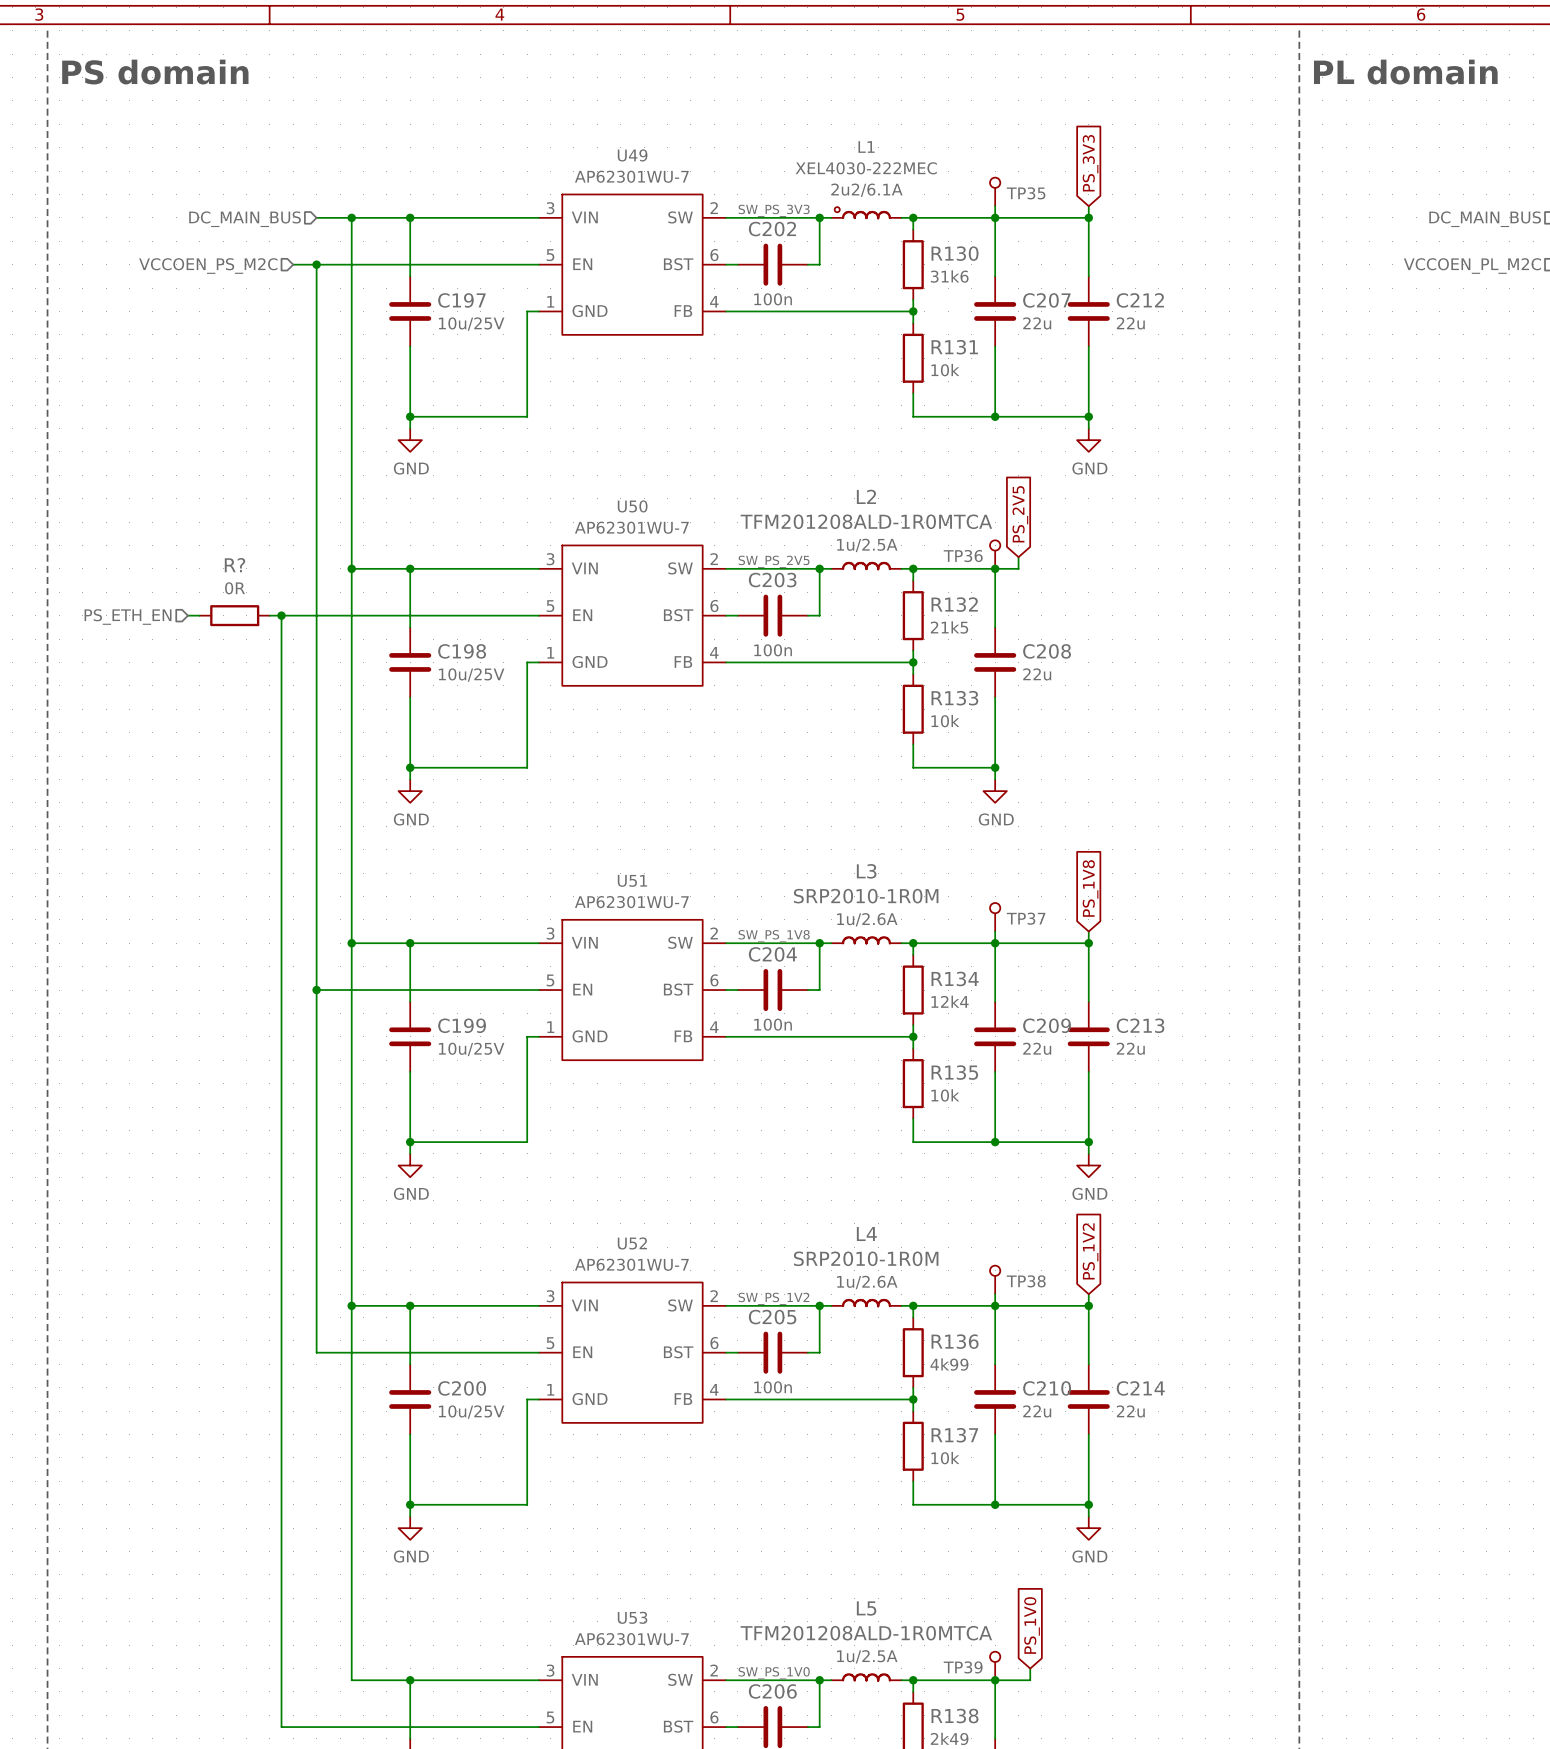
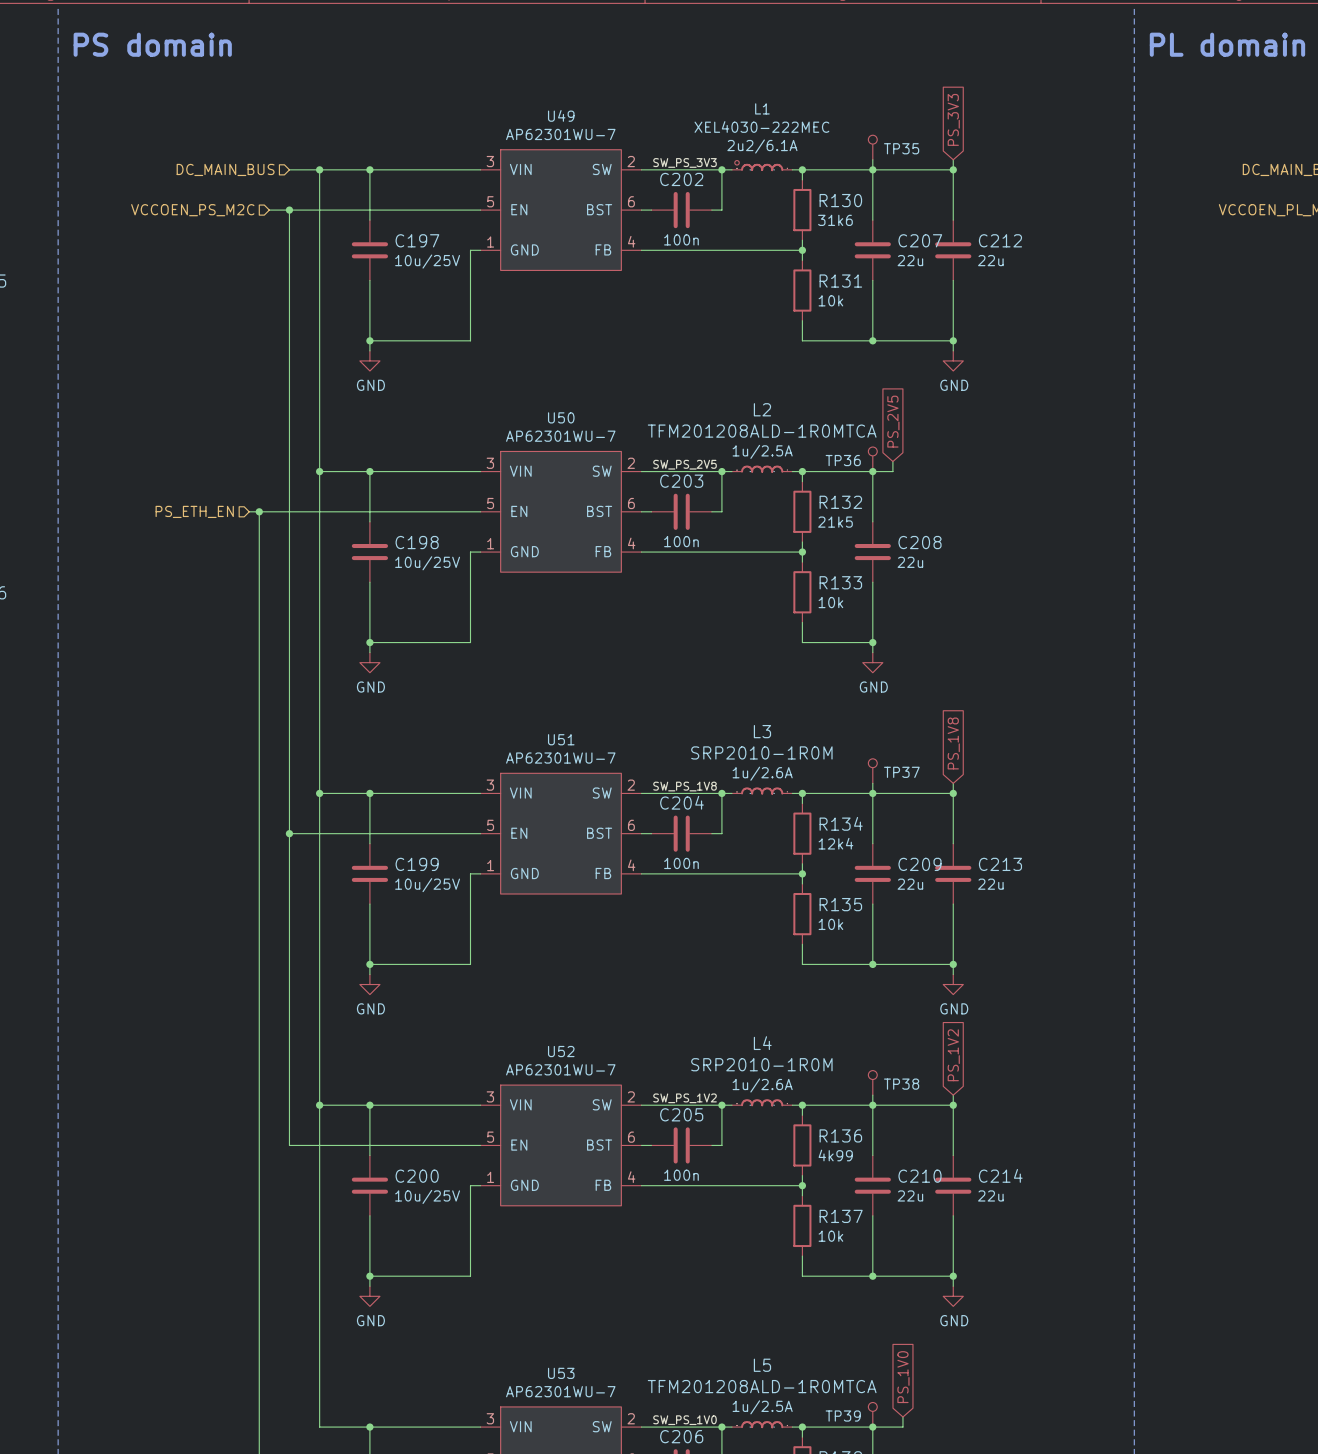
wire: (187, 615) (199, 615) -> none
R?: (234, 615) -> none
hierarchical label position: PS_ETH_EN (128, 616) -> PS_ETH_EN (194, 511)

